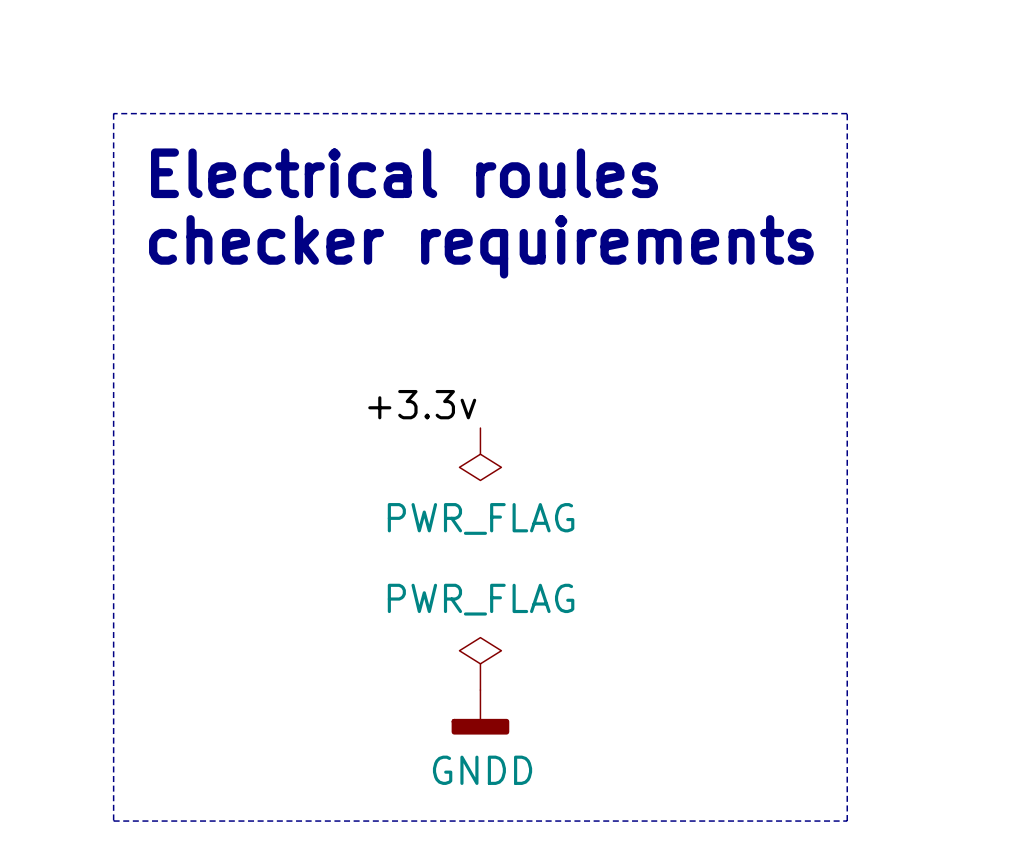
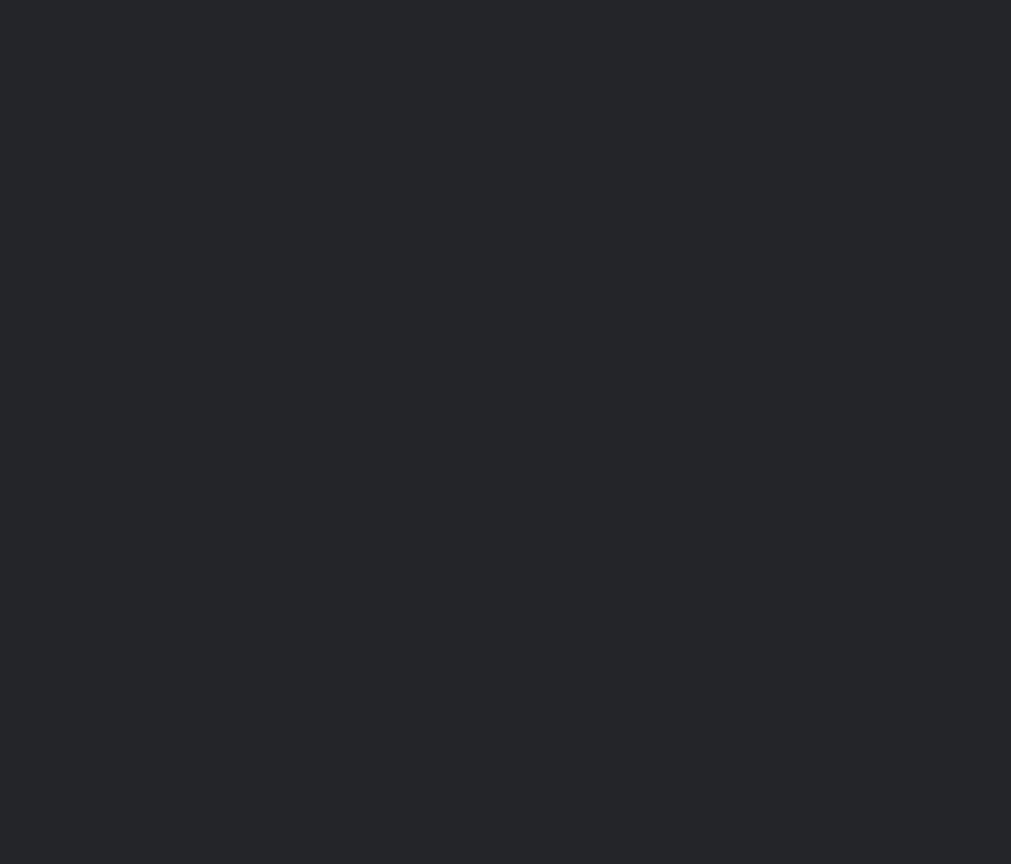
line: (113, 113) (113, 821) (847, 821) (847, 113) (113, 113) -> none
text: Electrical roules (404, 173) -> none
text: checker requirements (481, 246) -> none
label: +3.3v (422, 404) -> none
power symbol: PWR_FLAG (480, 454) -> none
power symbol: PWR_FLAG (480, 663) -> none
power symbol: GNDD (480, 712) -> none

